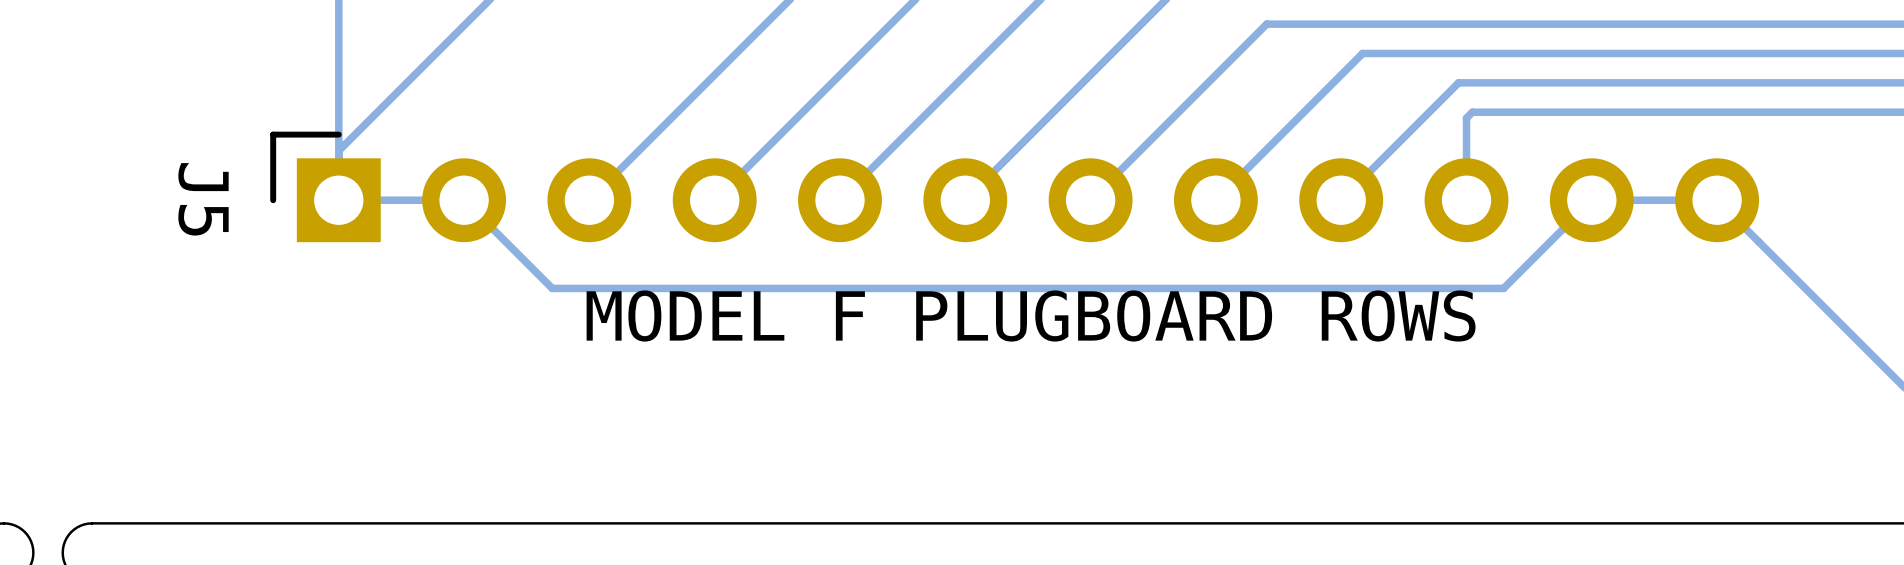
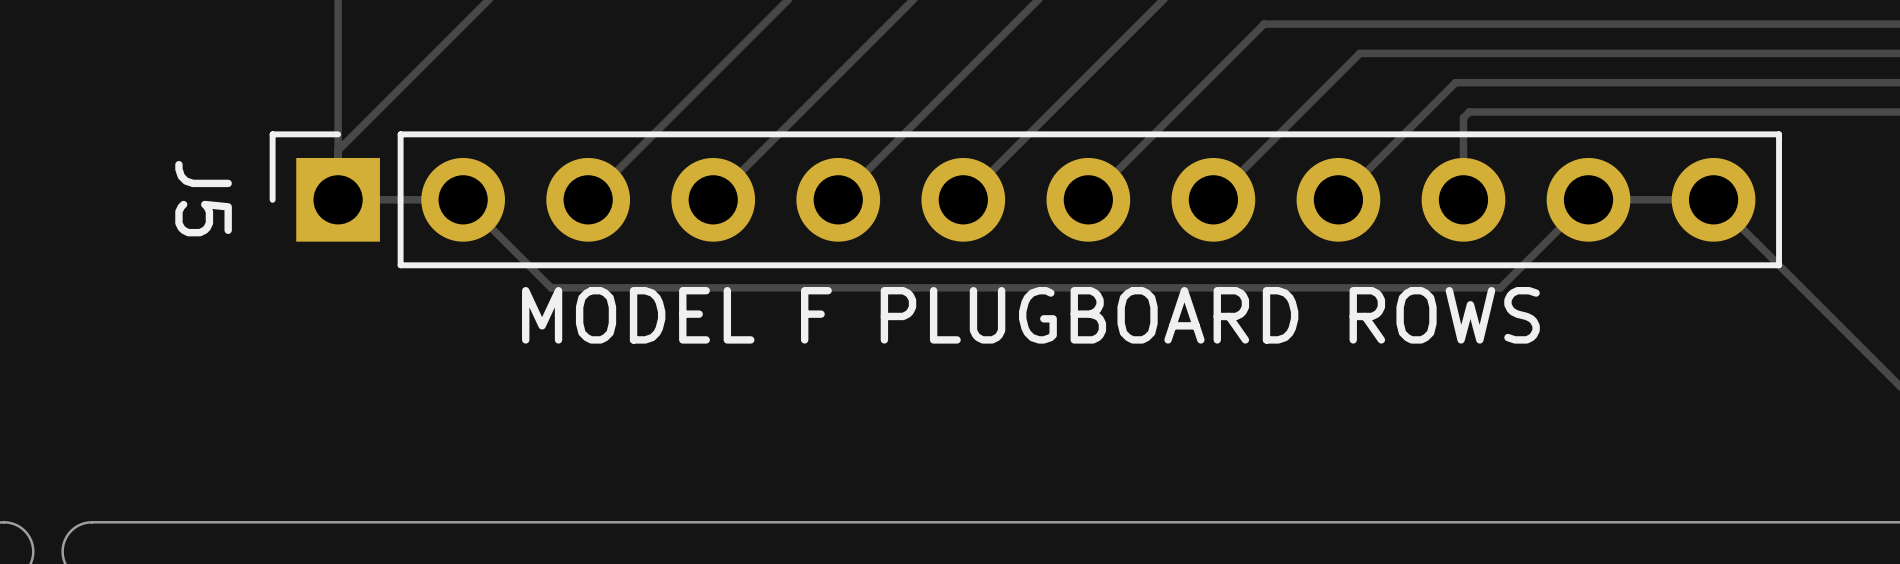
J5 footprint: [270, 131, 1760, 243] -> [269, 131, 1782, 269]

